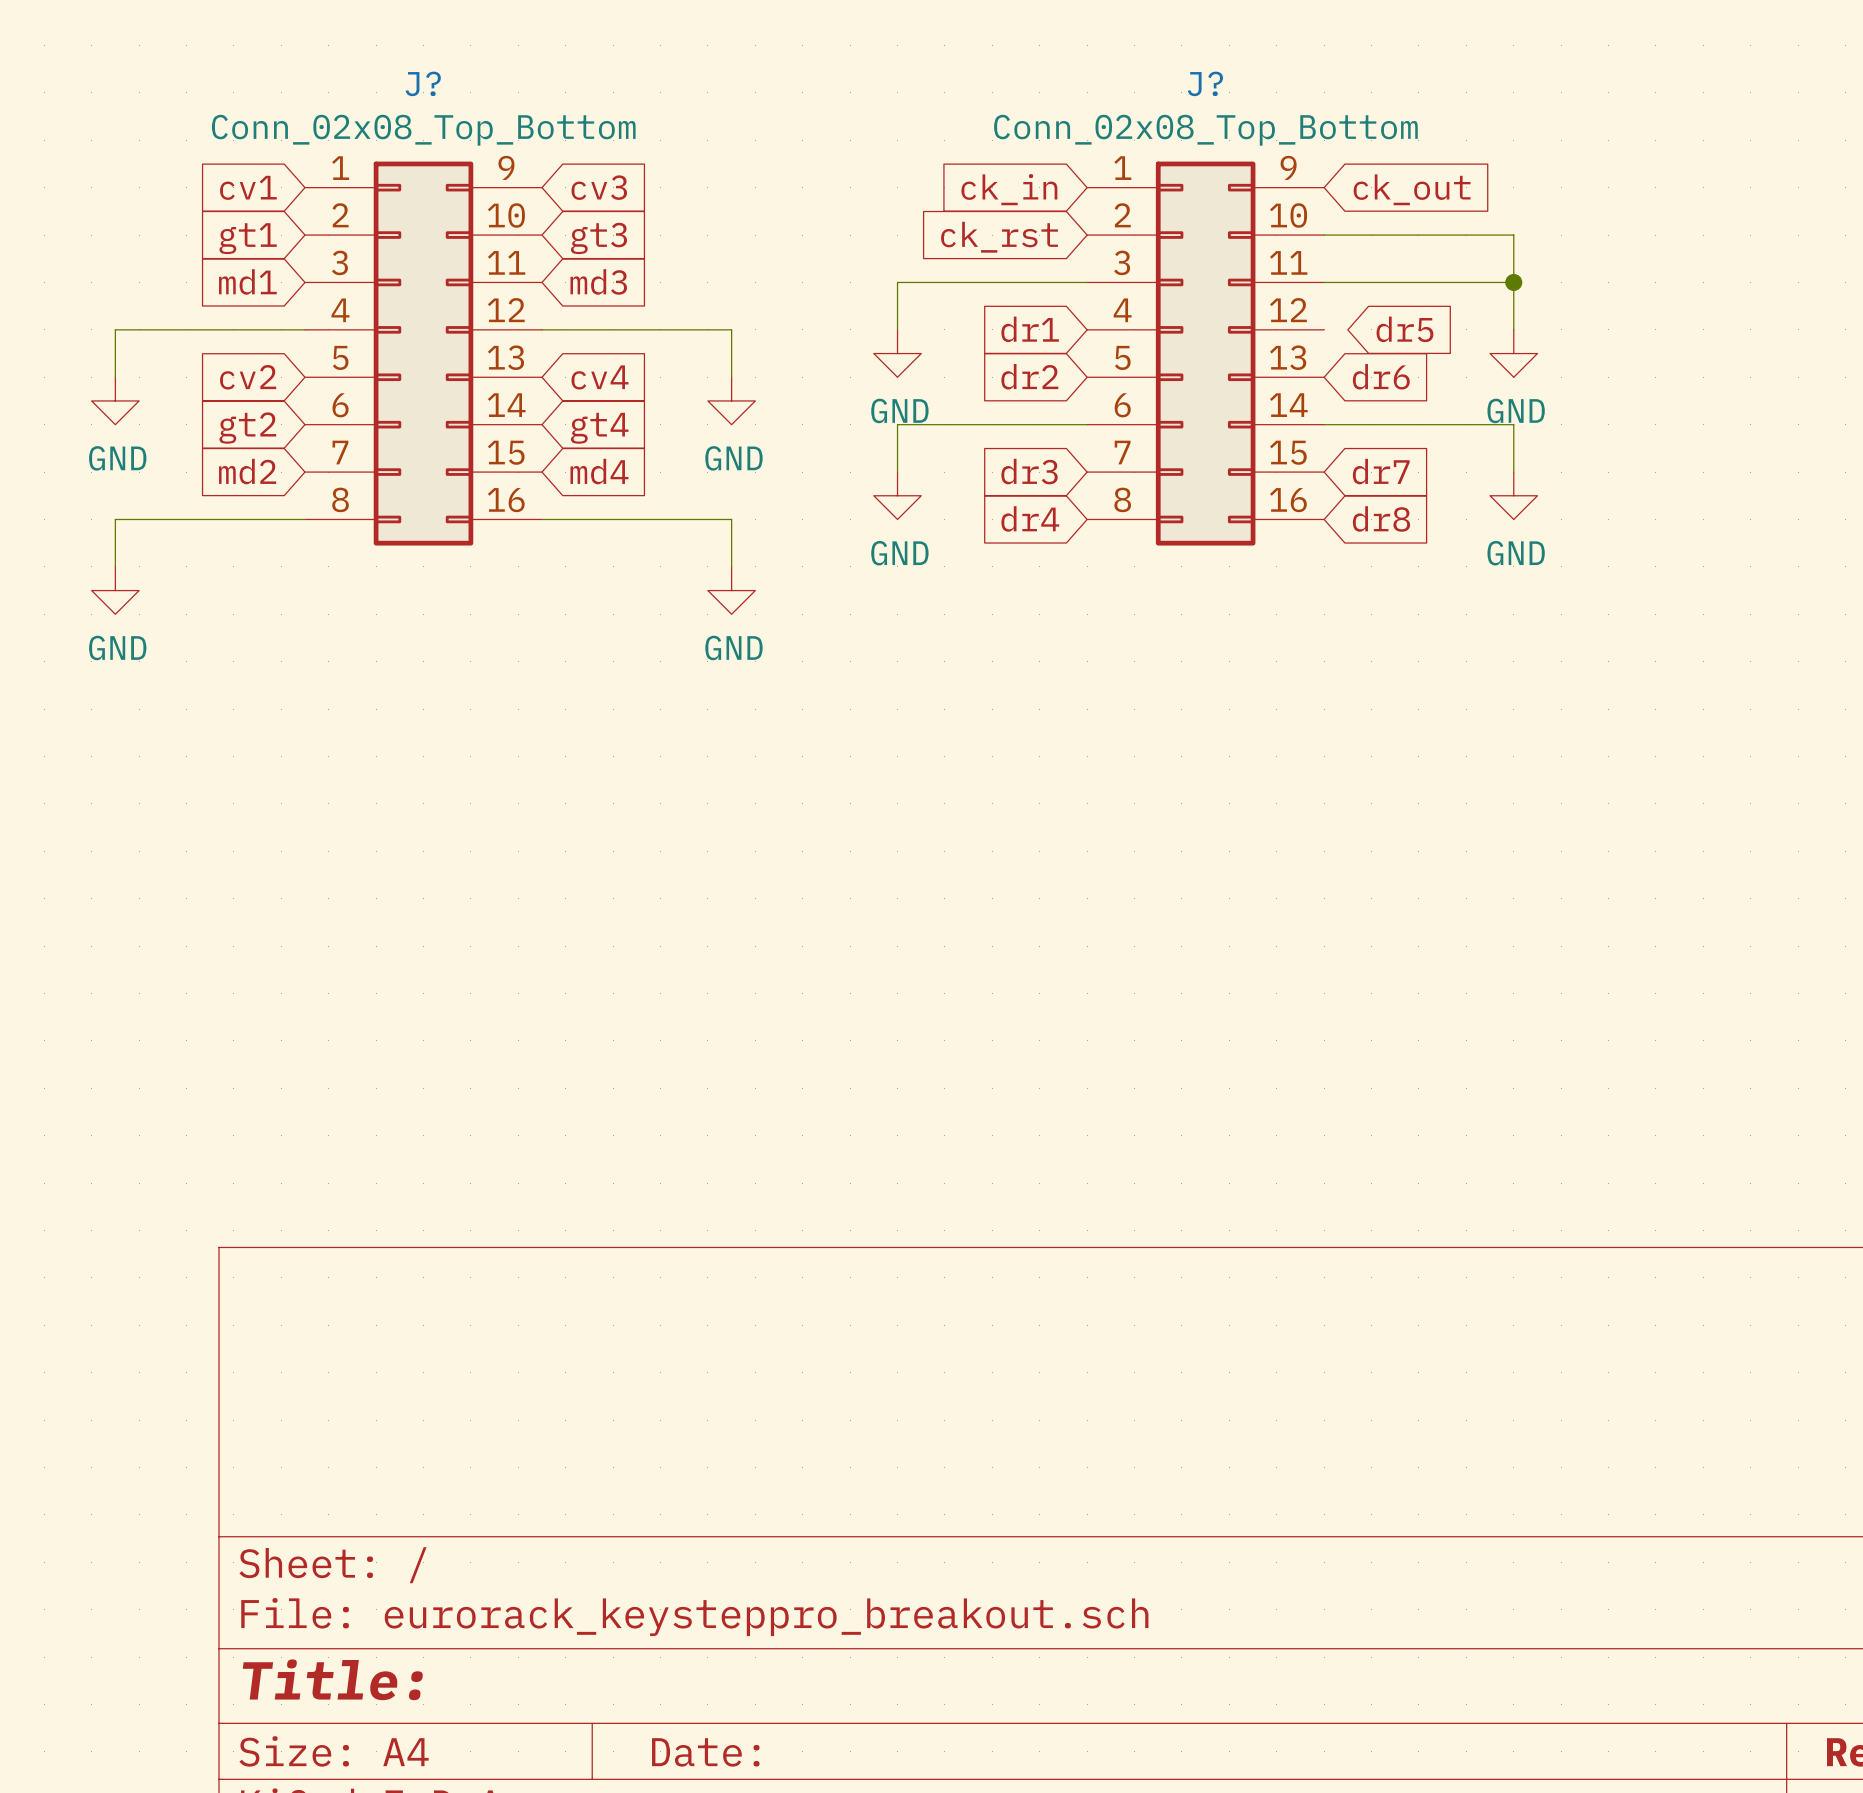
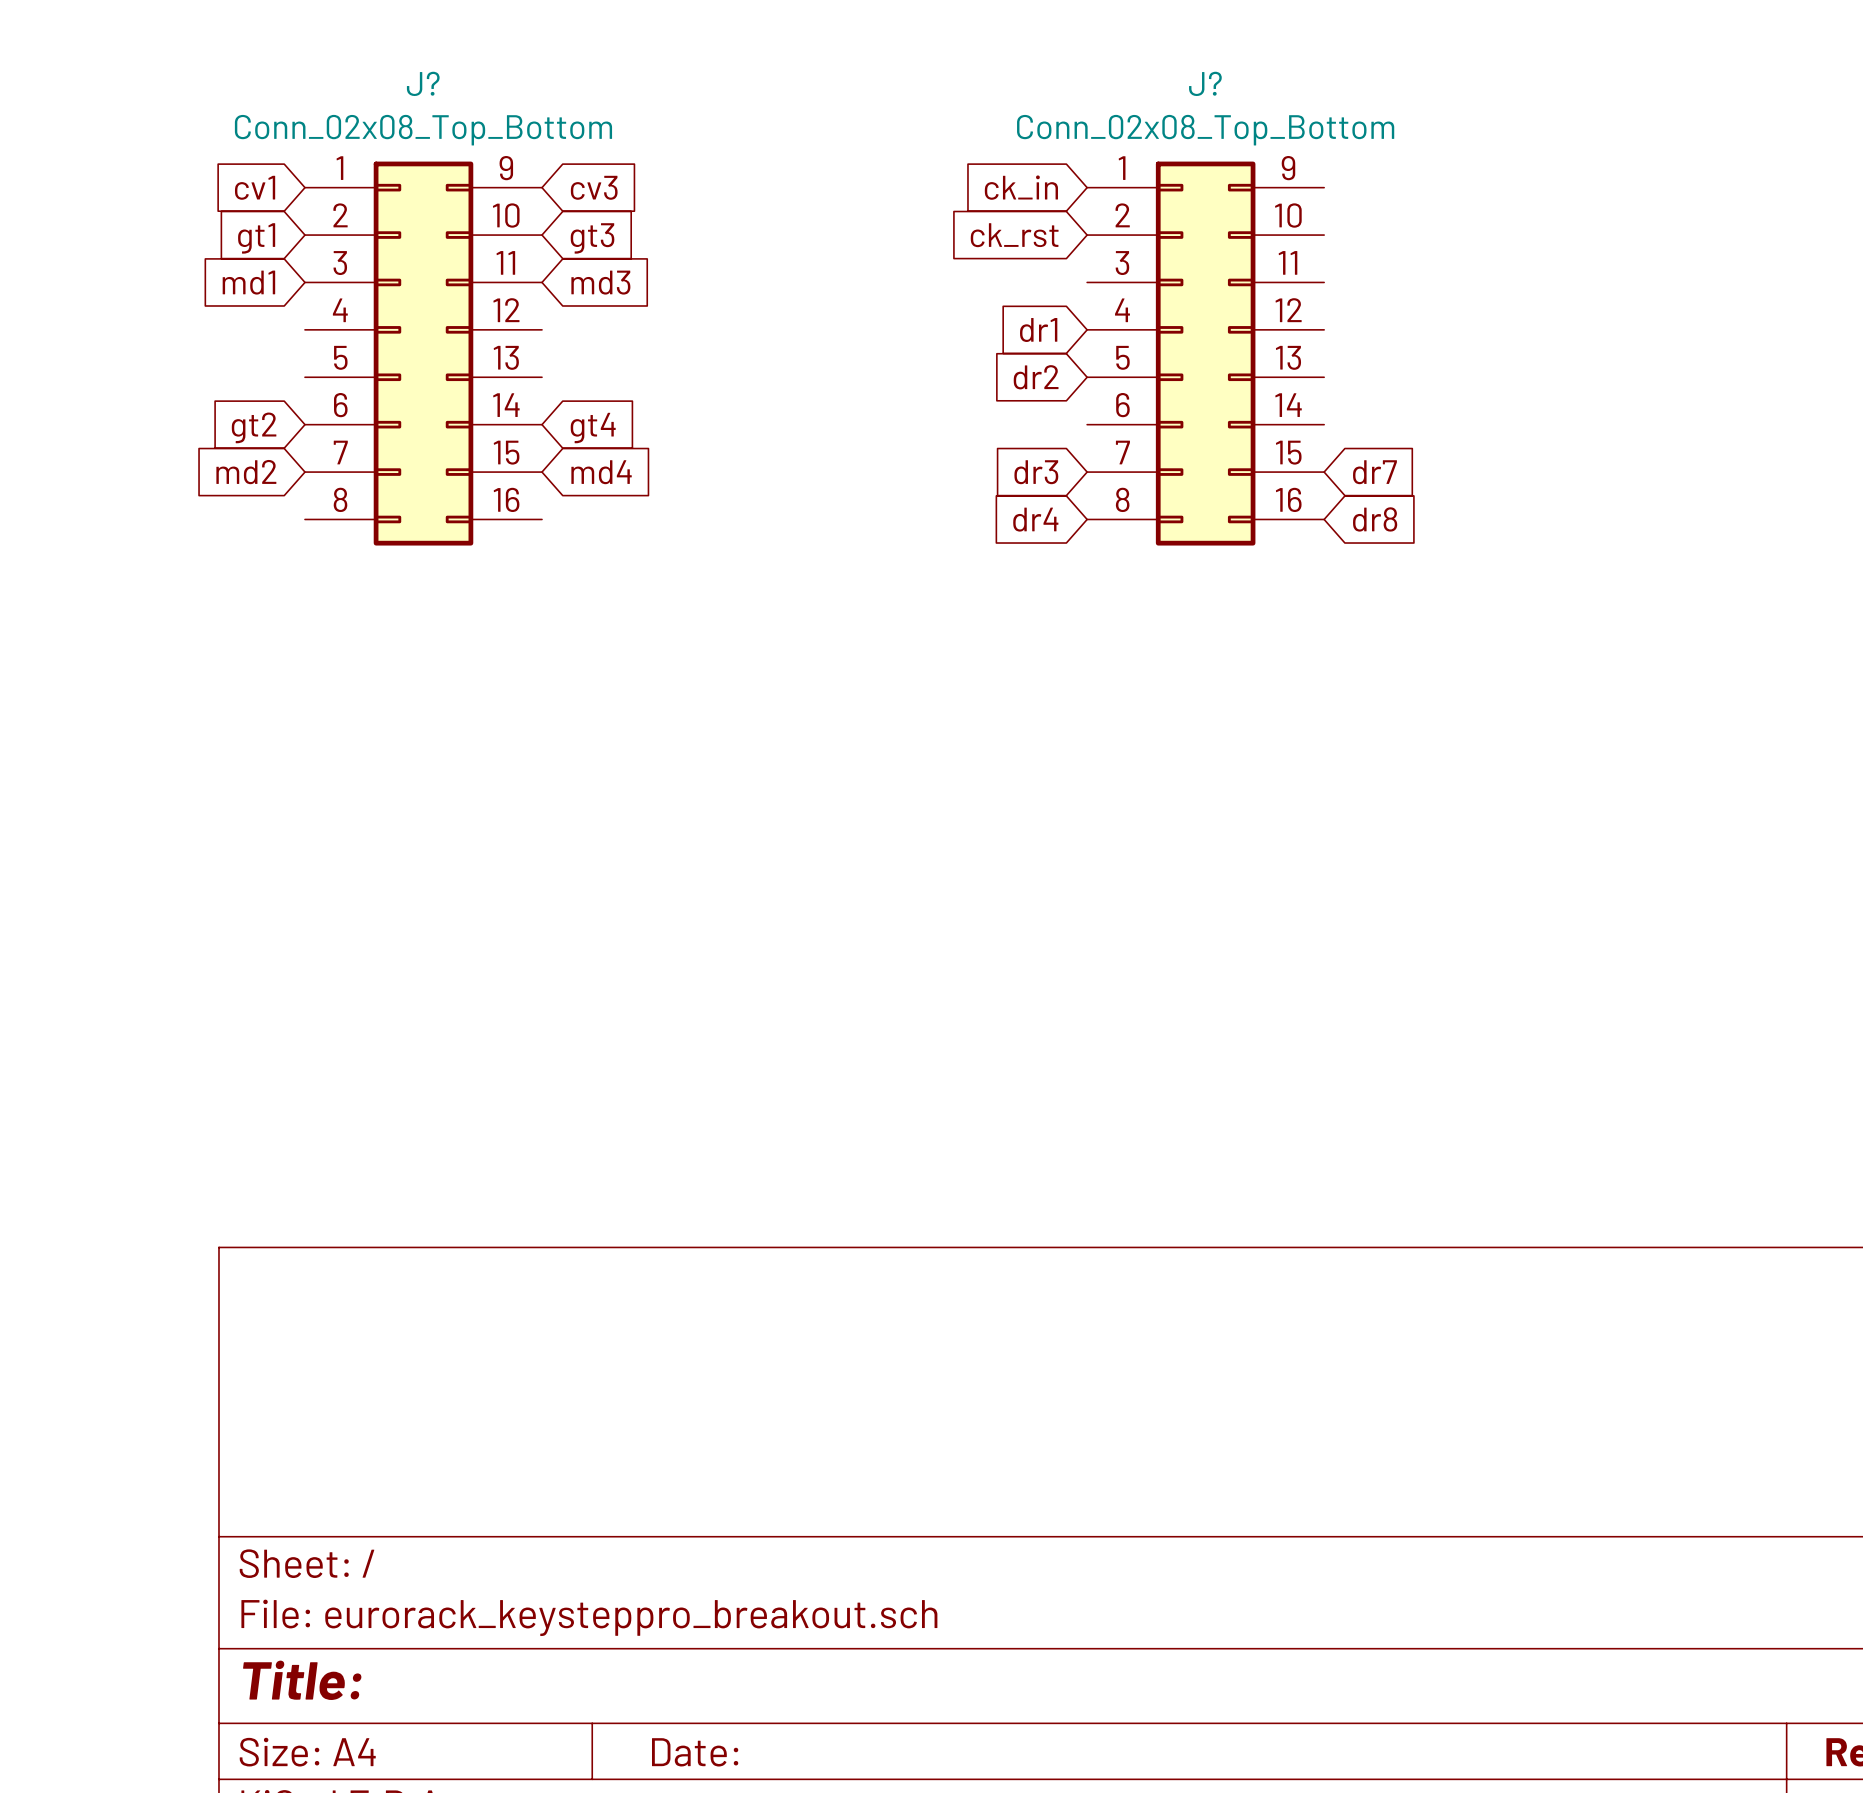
global label: ck_out (1412, 189) -> none
wire: (1324, 235) (1513, 235) (1513, 329) -> none
wire: (1087, 282) (897, 282) (897, 329) -> none
wire: (1324, 282) (1513, 282) -> none
junction: (1513, 282) -> none
wire: (304, 329) (115, 329) (115, 377) -> none
wire: (542, 329) (731, 329) (731, 377) -> none
global label: dr5 (1404, 329) -> none
power symbol: GND (897, 353) -> none
power symbol: GND (1513, 353) -> none
global label: dr6 (1381, 376) -> none
global label: cv2 (248, 377) -> none
global label: cv4 (600, 377) -> none
power symbol: GND (115, 400) -> none
power symbol: GND (731, 400) -> none
wire: (1087, 424) (897, 424) (897, 472) -> none
wire: (1324, 424) (1513, 424) (1513, 472) -> none
power symbol: GND (897, 495) -> none
power symbol: GND (1513, 495) -> none
wire: (304, 519) (115, 519) (115, 566) -> none
wire: (542, 519) (731, 519) (731, 566) -> none
power symbol: GND (115, 590) -> none
power symbol: GND (731, 590) -> none

